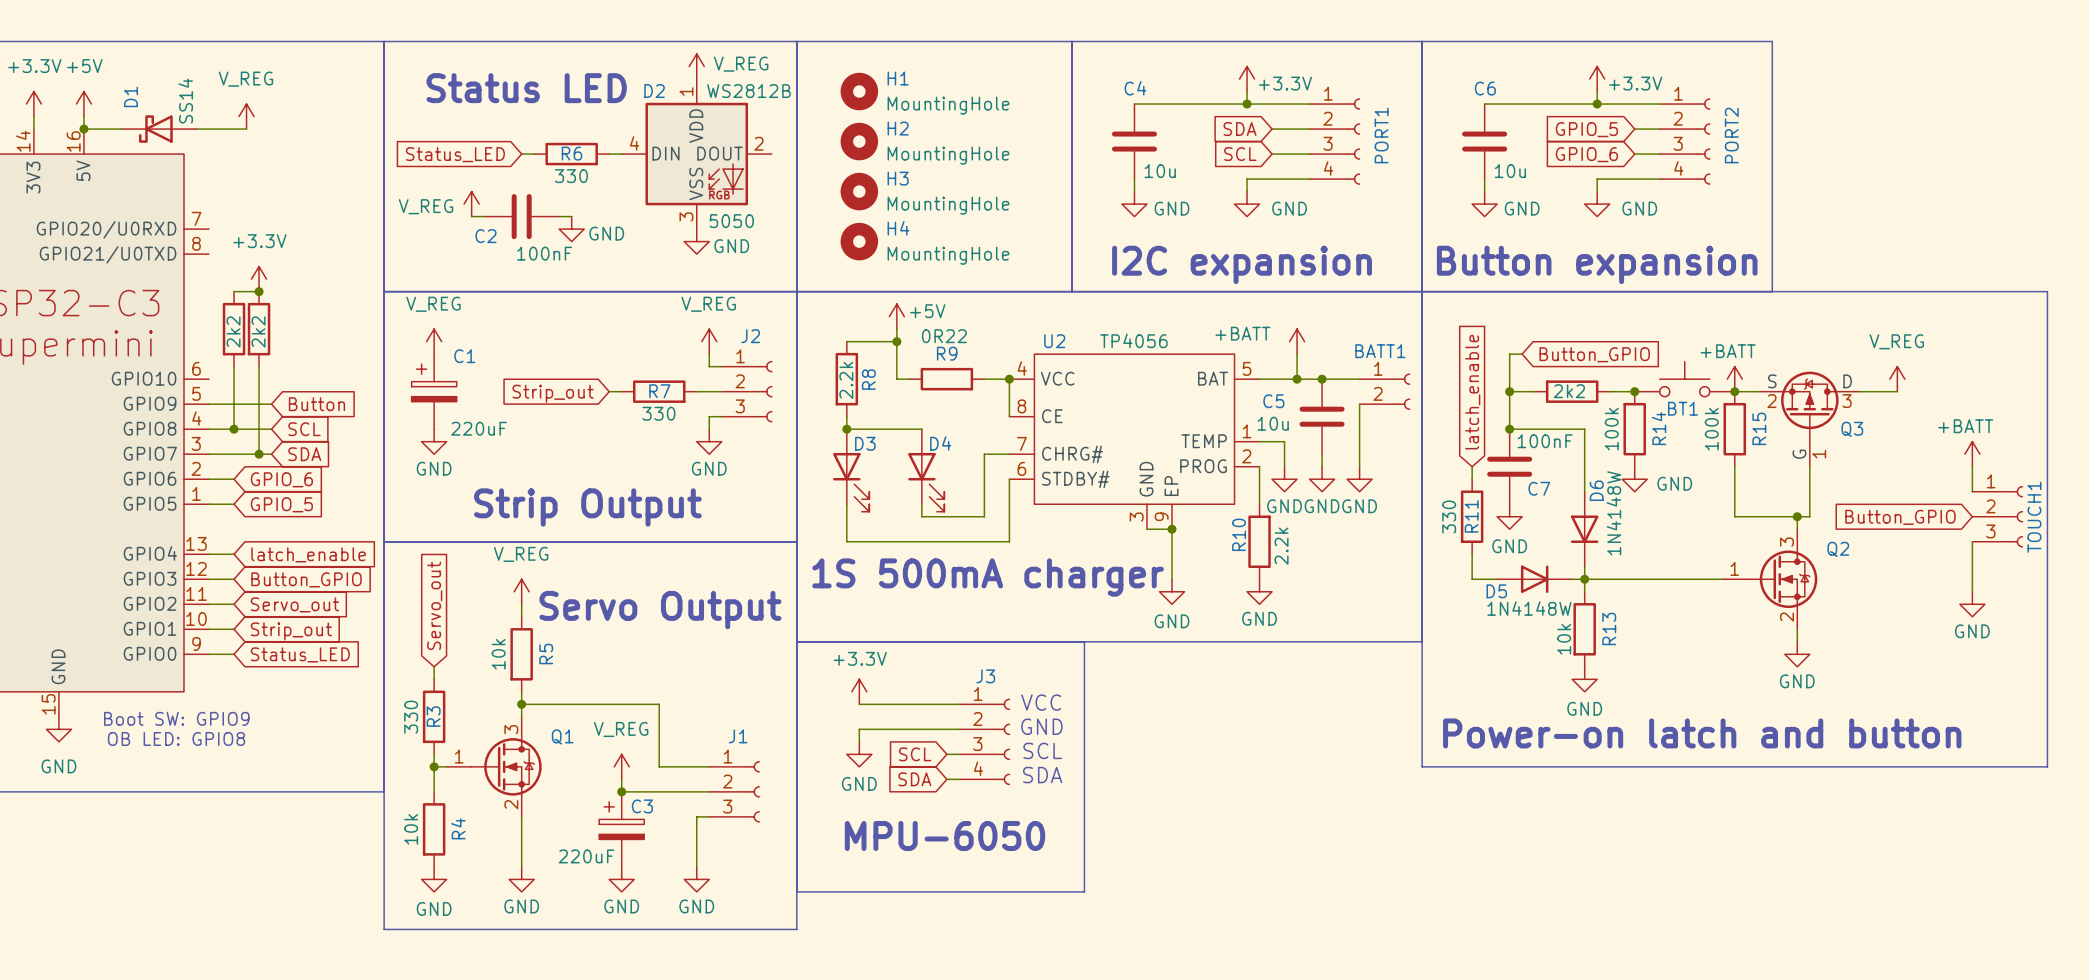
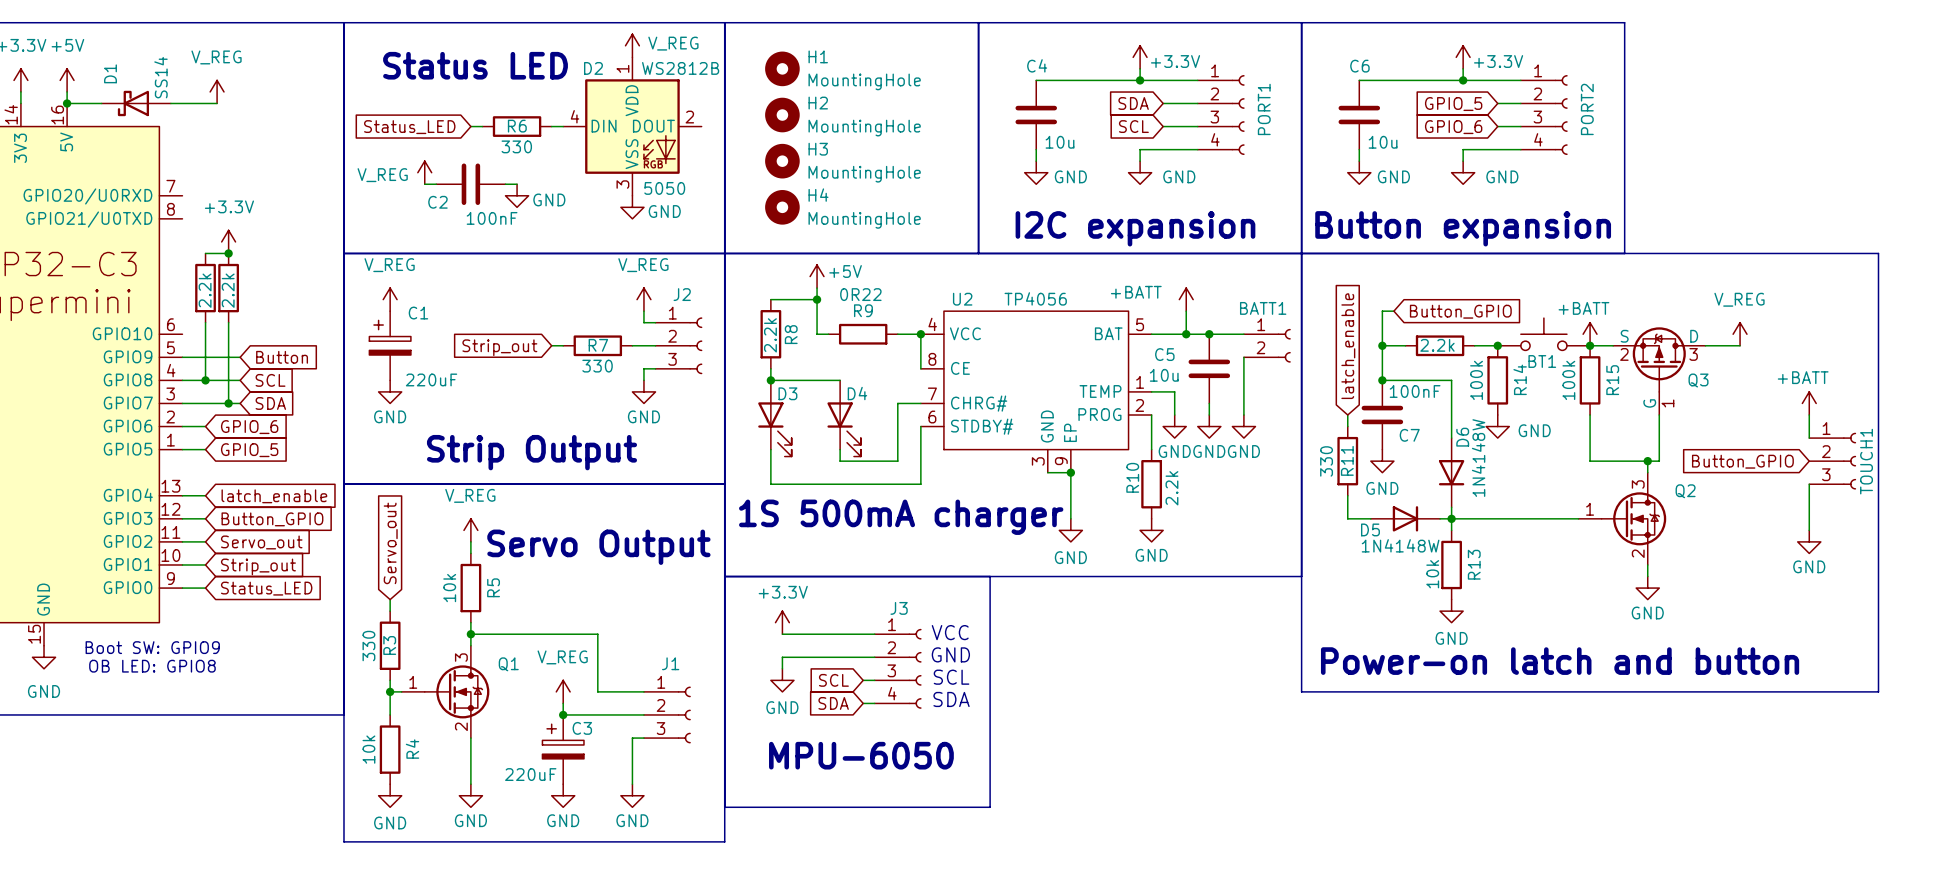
part value: 2k2 (233, 331) -> 2.2k (205, 290)
part value: 2k2 (258, 331) -> 2.2k (228, 290)
part value: 2k2 (1569, 391) -> 2.2k (1437, 345)

